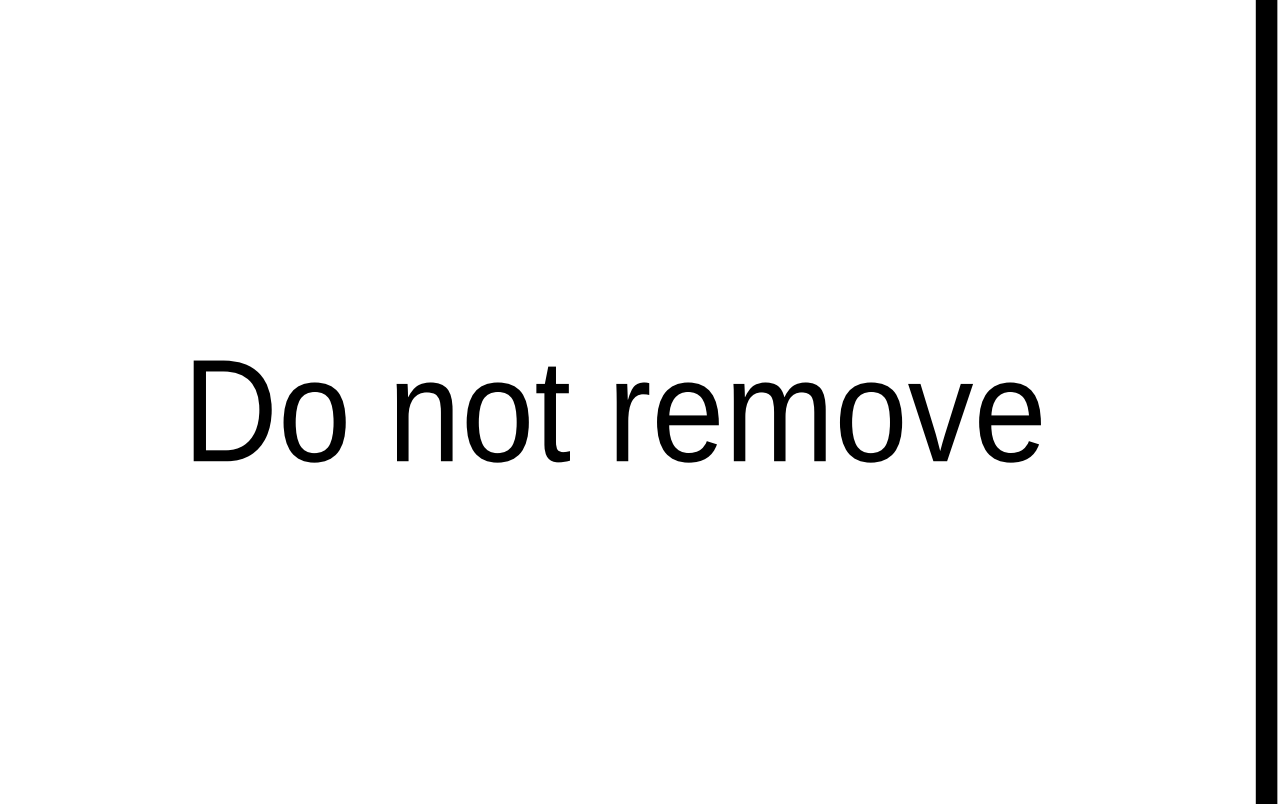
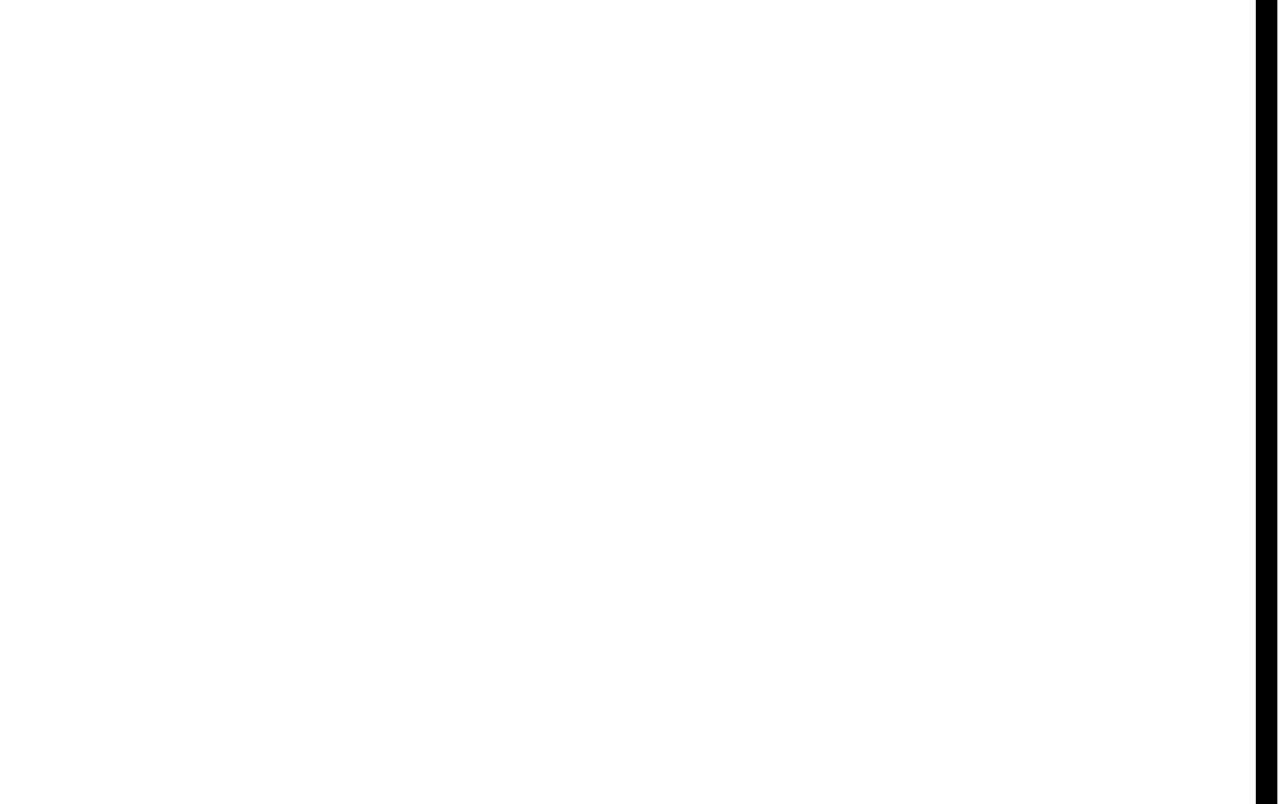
text: Do not remove (617, 411) -> none

